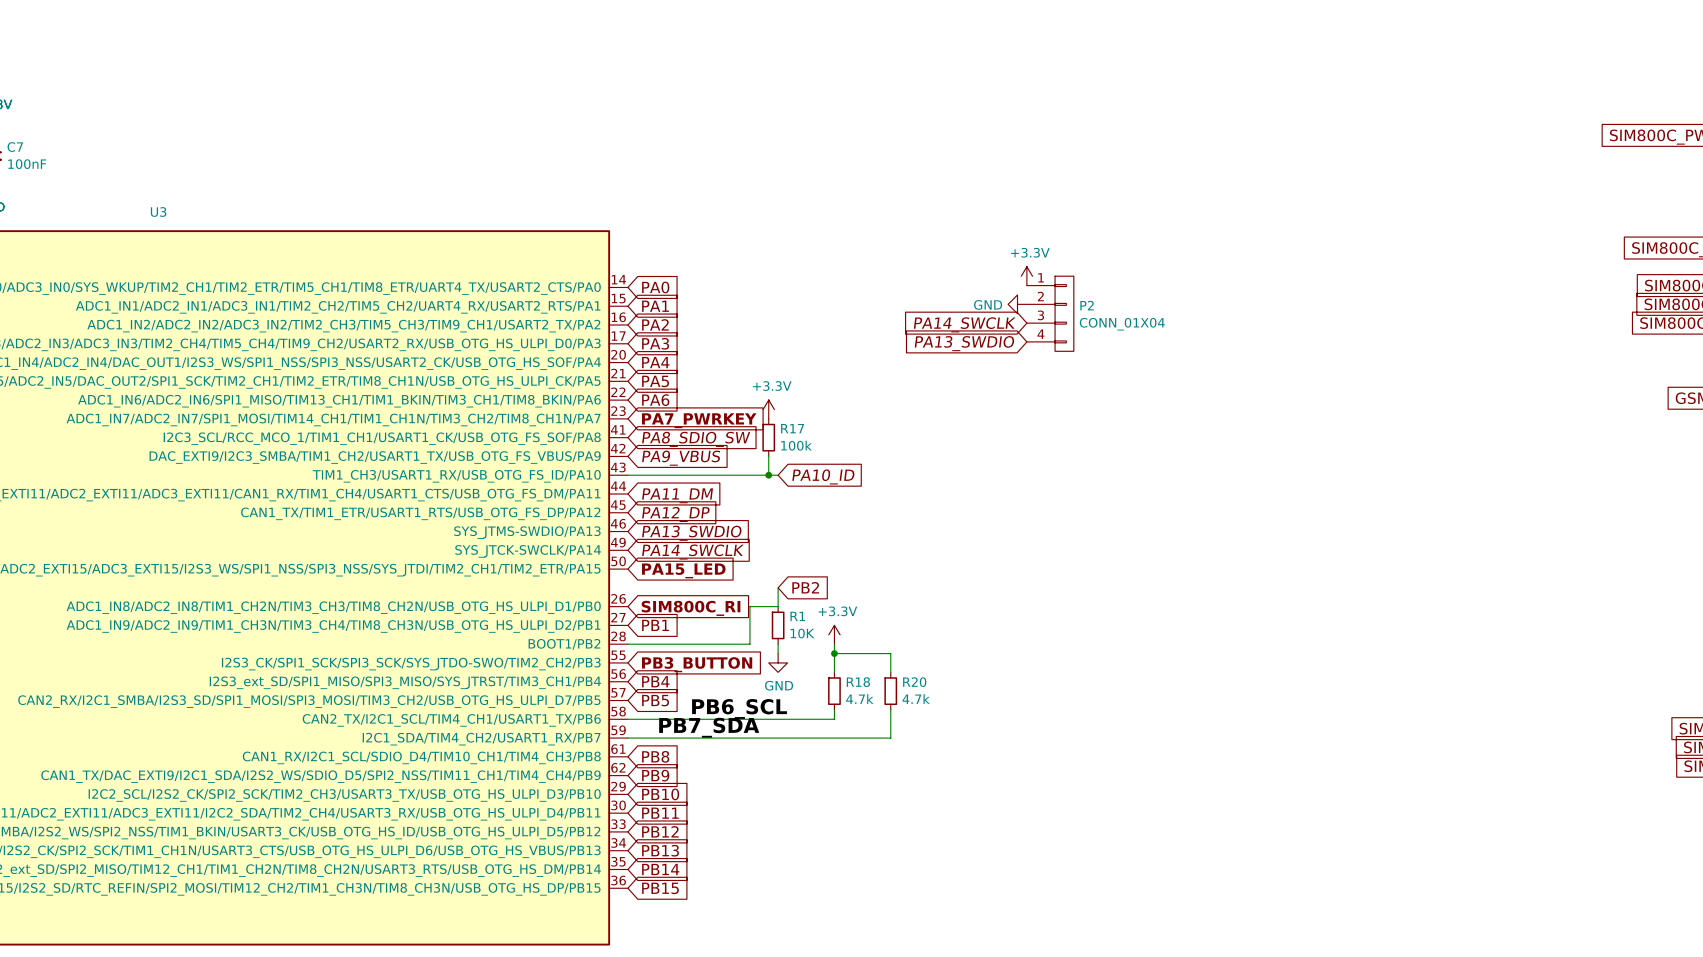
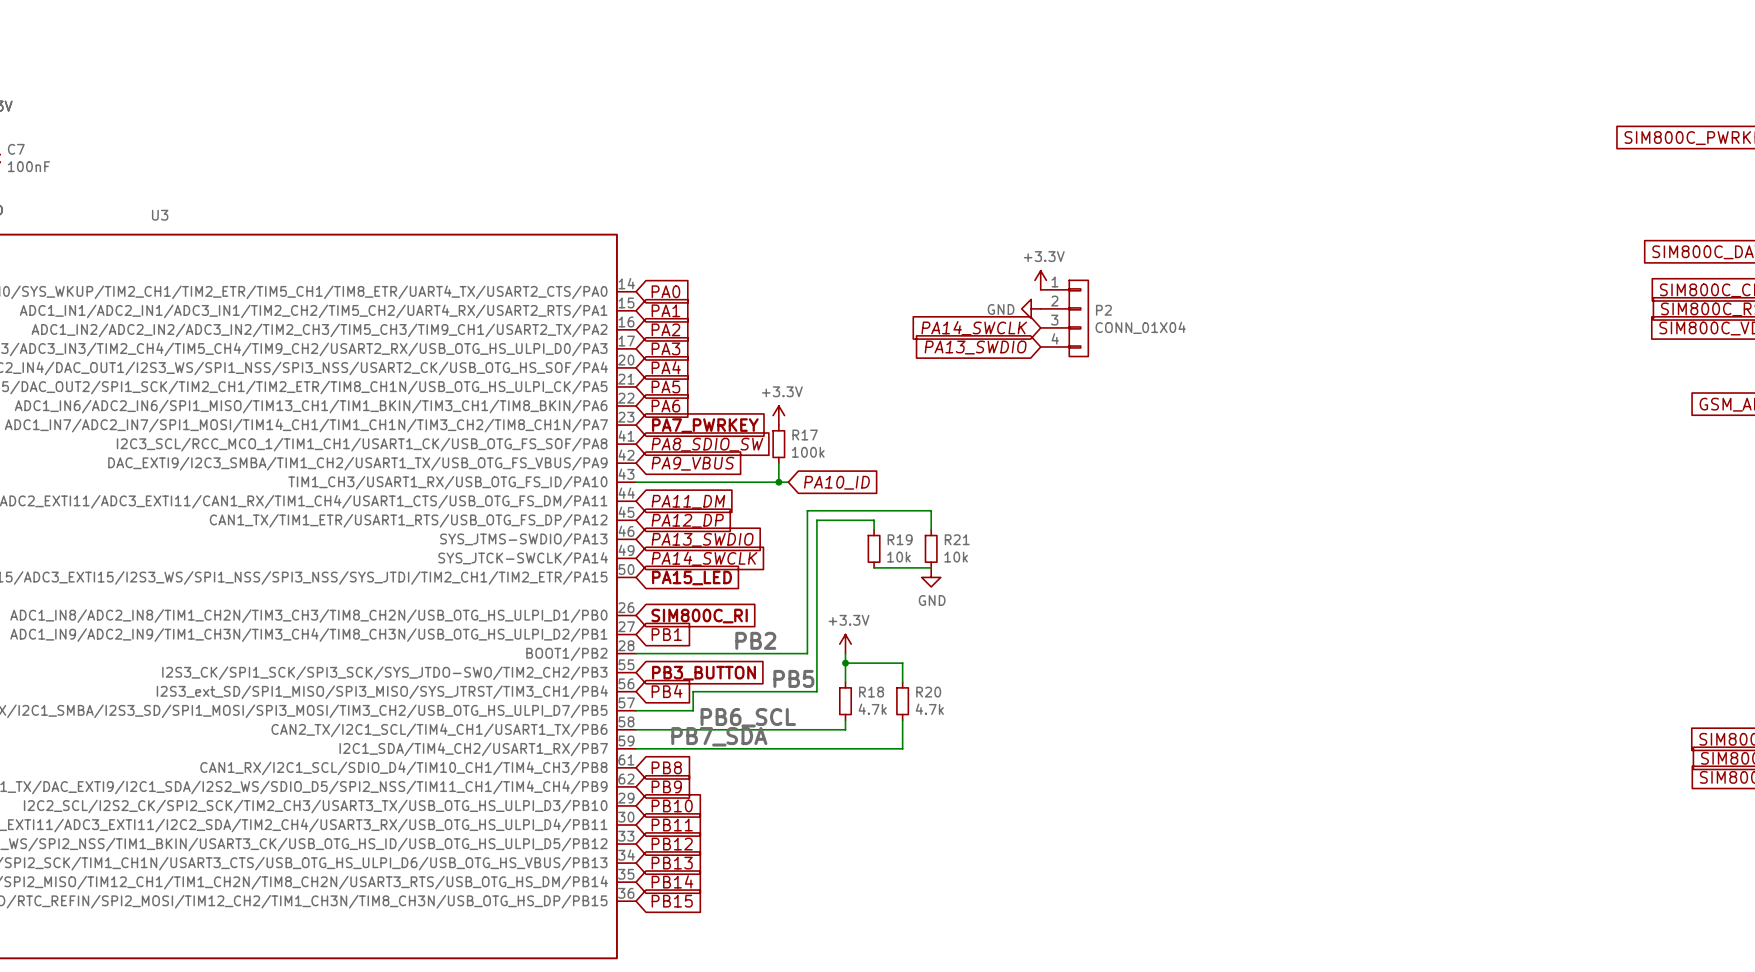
wire: none -> (874, 529) (874, 520) (816, 520) (816, 691) (693, 691) (693, 710) (636, 710)
R19: none -> 10k (874, 548)
R21: none -> 10k (931, 548)
wire: none -> (874, 567) (931, 567)
wire: (778, 587) (778, 606) (749, 606) (749, 644) -> (931, 529) (931, 510) (807, 510) (807, 653) (759, 653)
global label: PB2 (805, 587) -> none
R1: 10K (778, 625) -> none
label: none -> PB2 (755, 640)
wire: (778, 644) (778, 653) -> none
power symbol position: GND (778, 662) -> GND (931, 577)
label: none -> PB5 (793, 678)
global label: PB5 (655, 700) -> none

